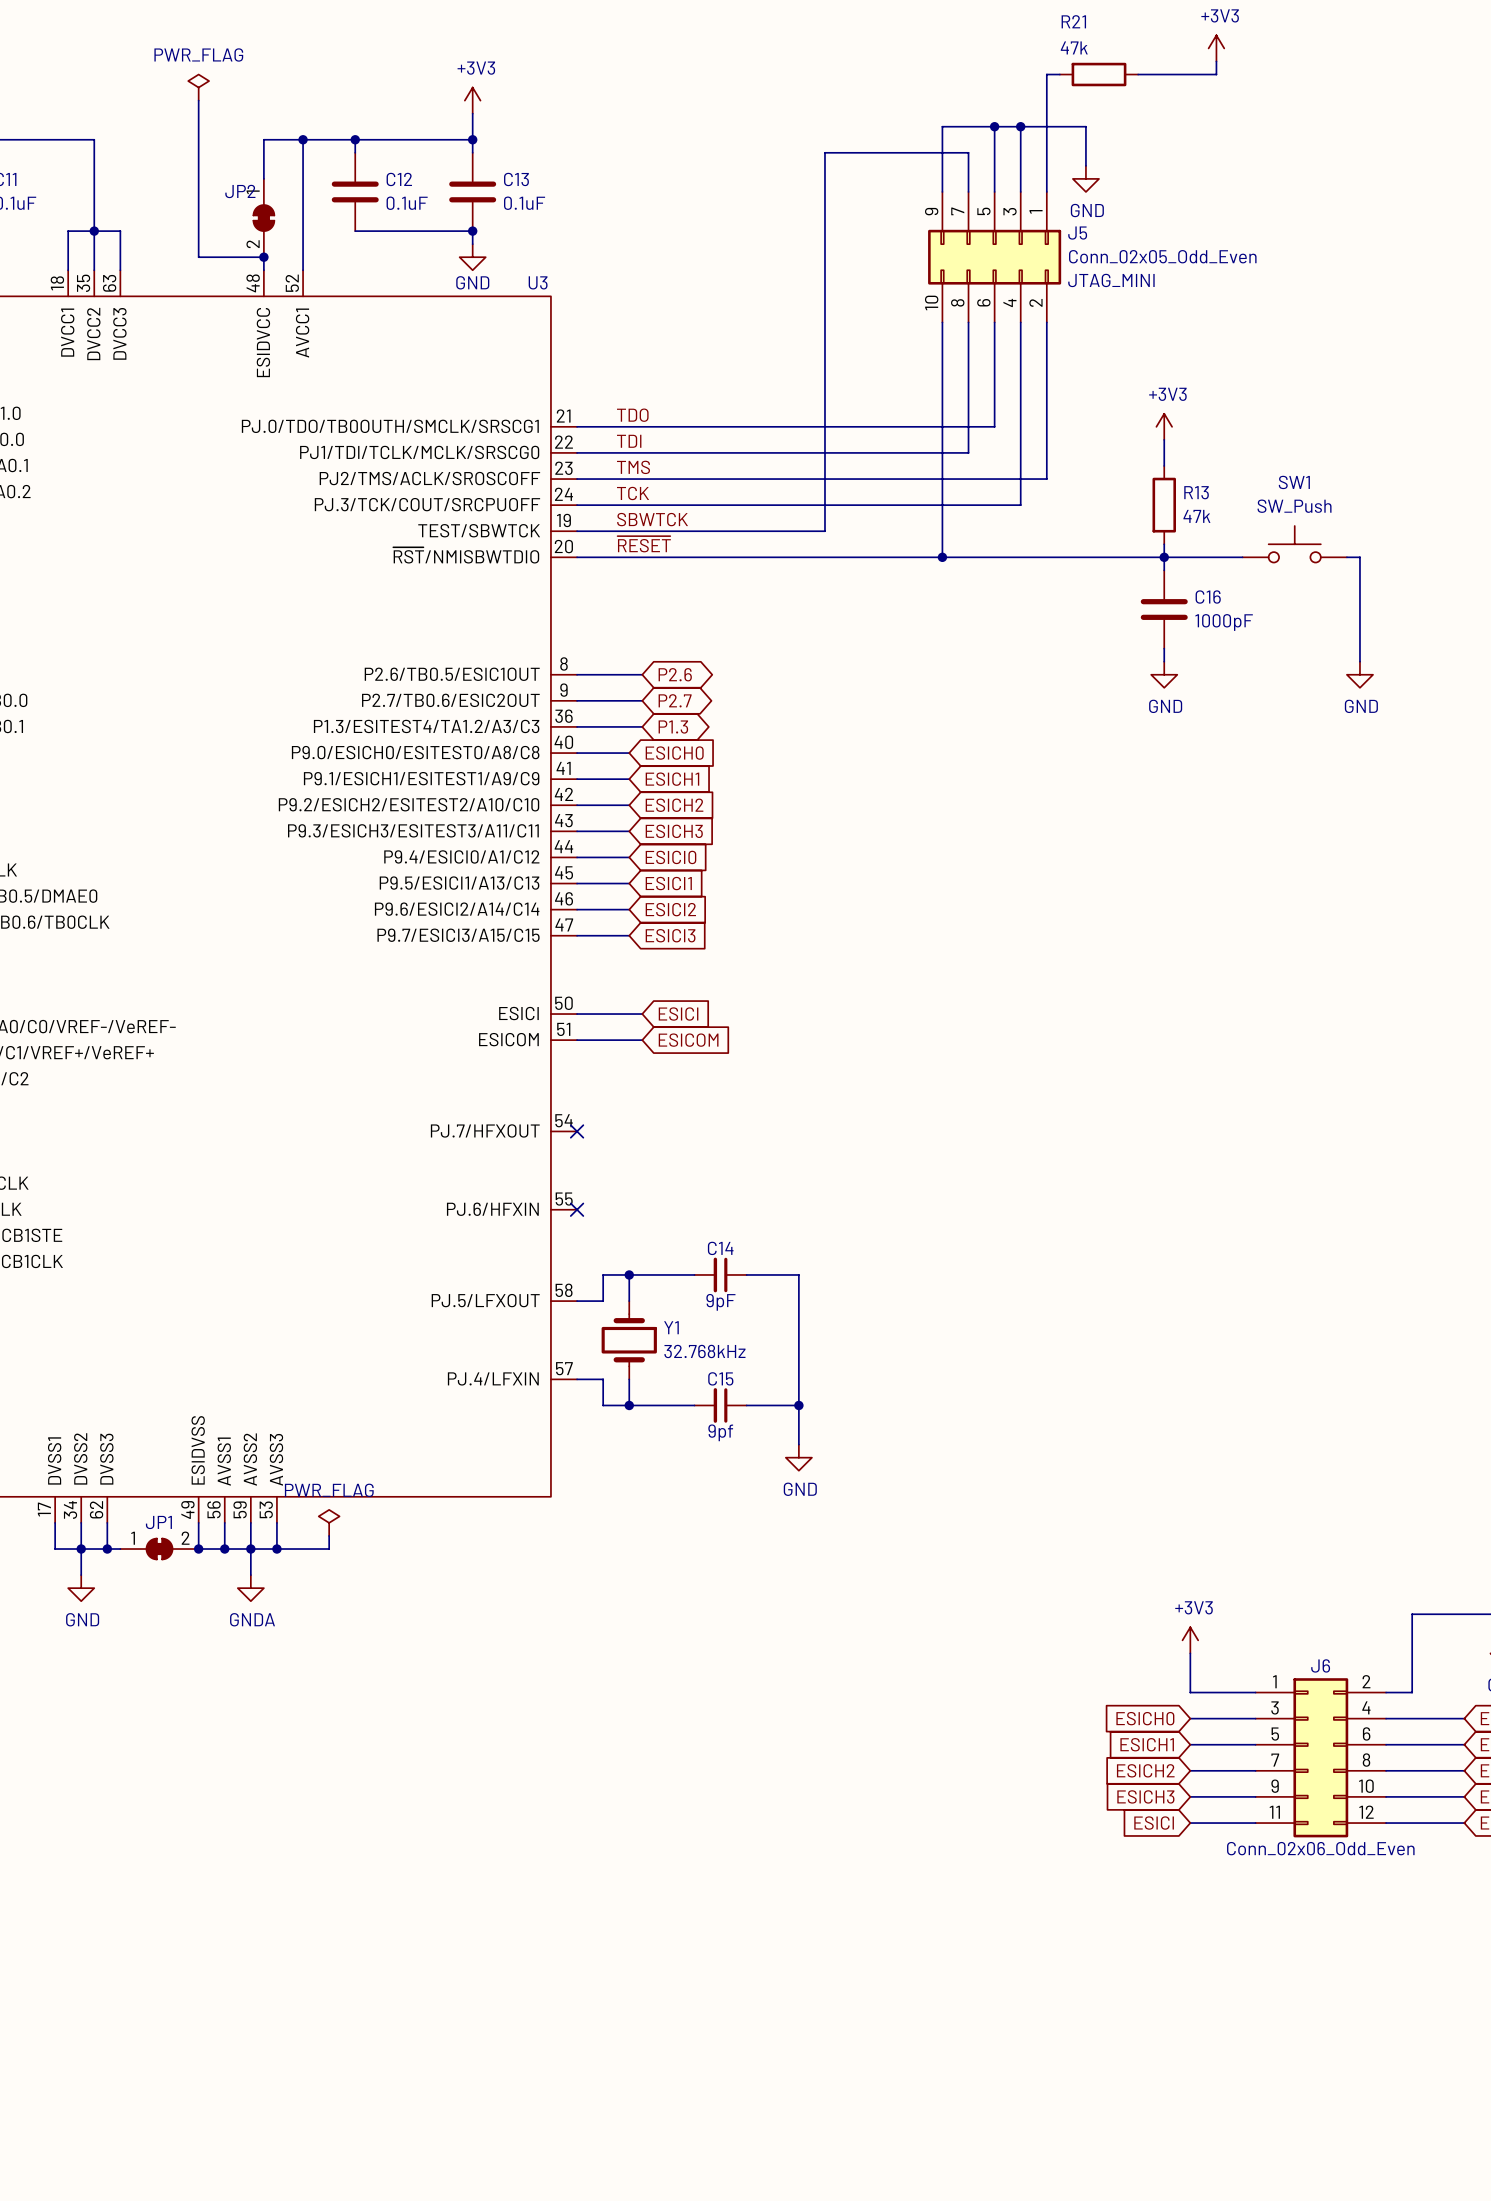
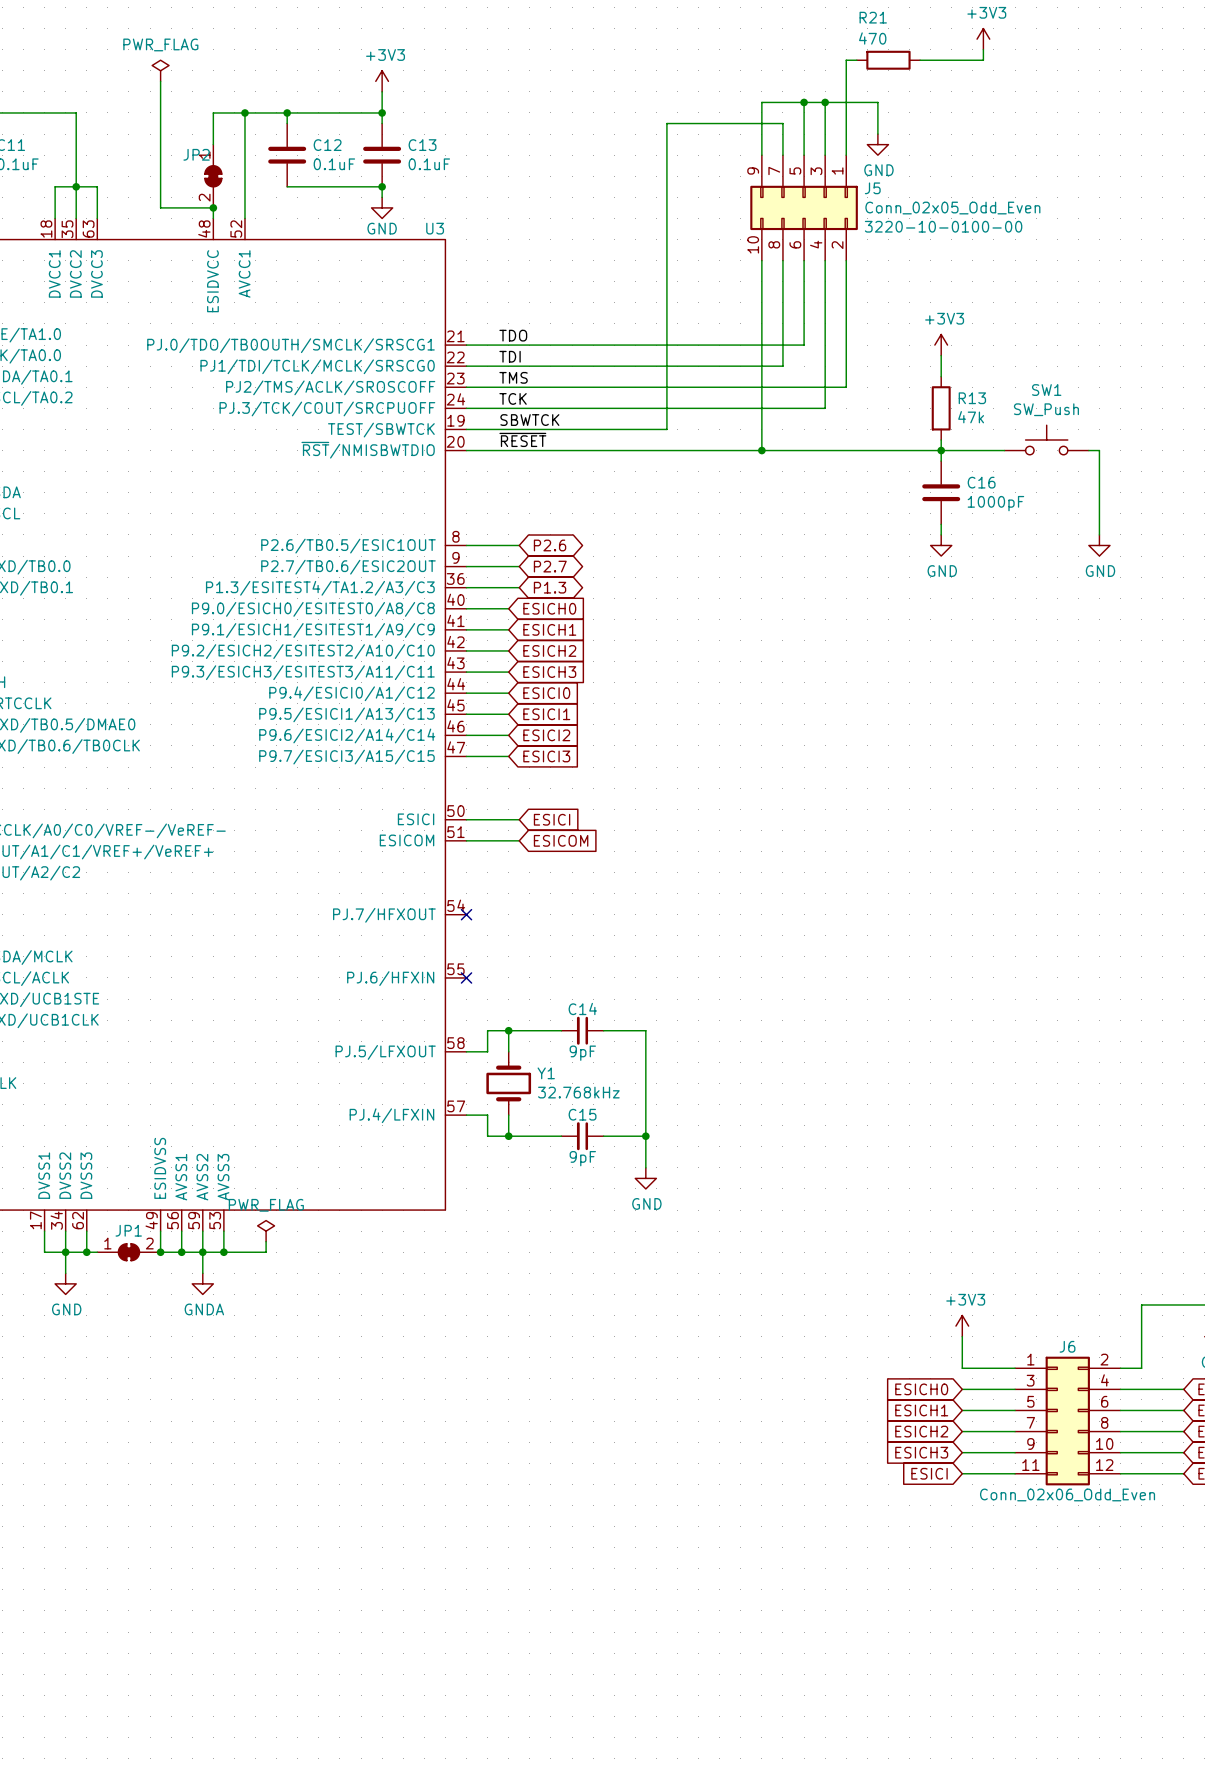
R21 value: 47k (1074, 47) -> 470 (872, 38)
J5 text: JTAG_MINI (1111, 280) -> none
J5 text: none -> 3220-10-0100-00 (943, 226)
C15 value: 9pf (720, 1432) -> 9pF (582, 1158)

